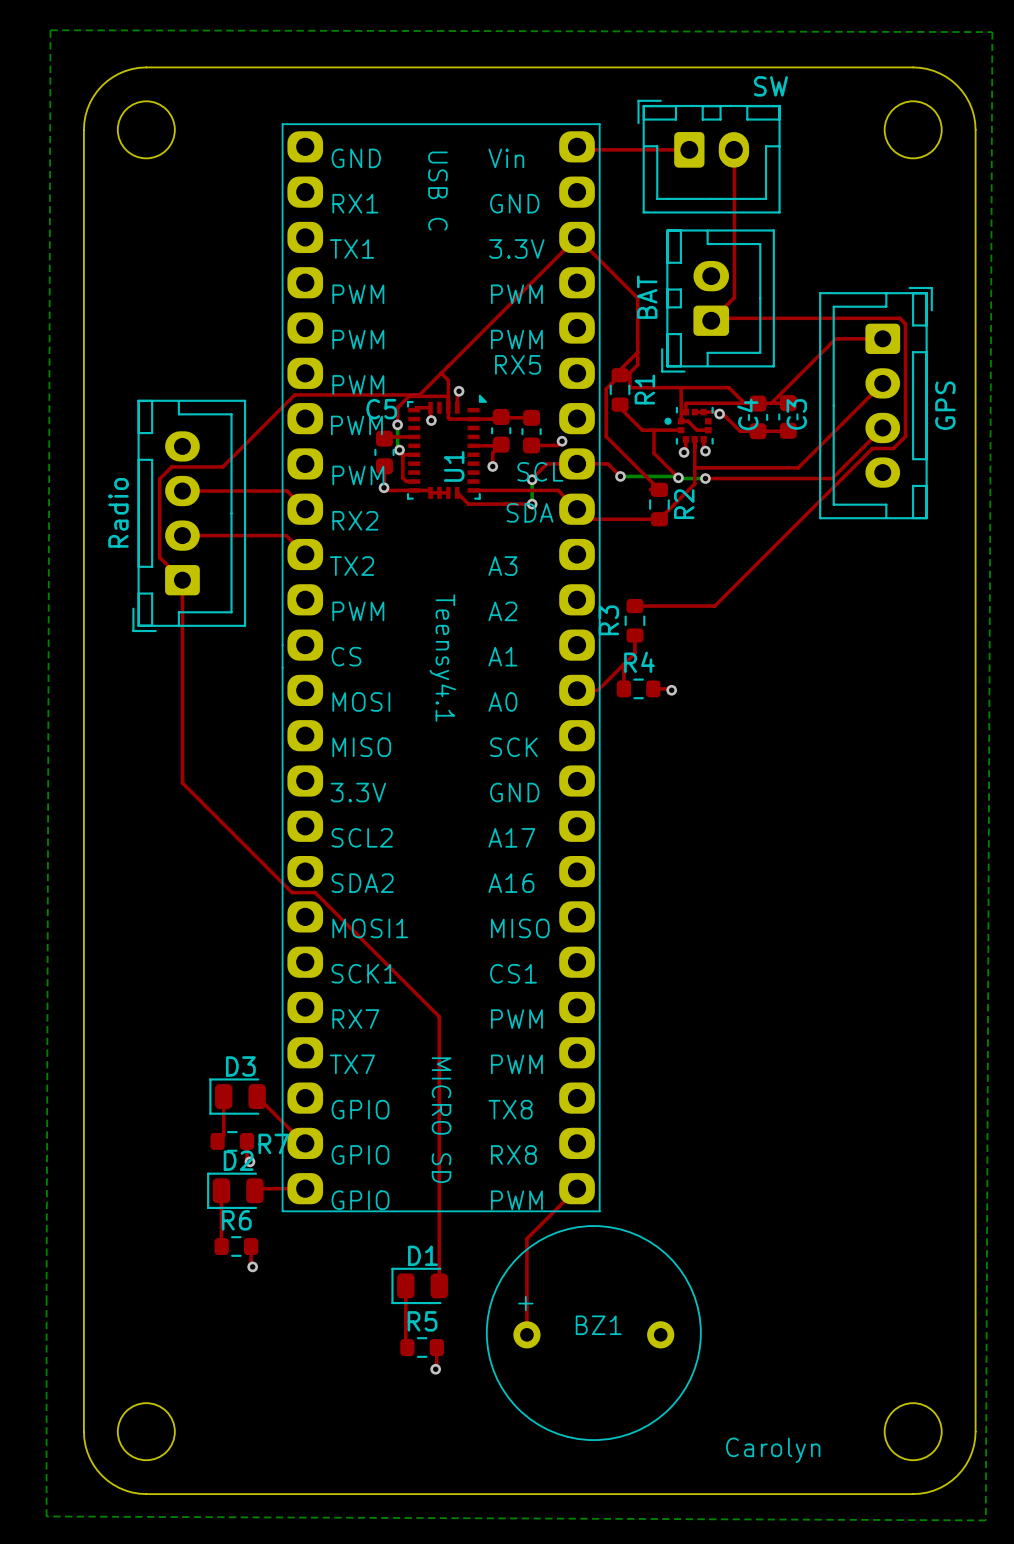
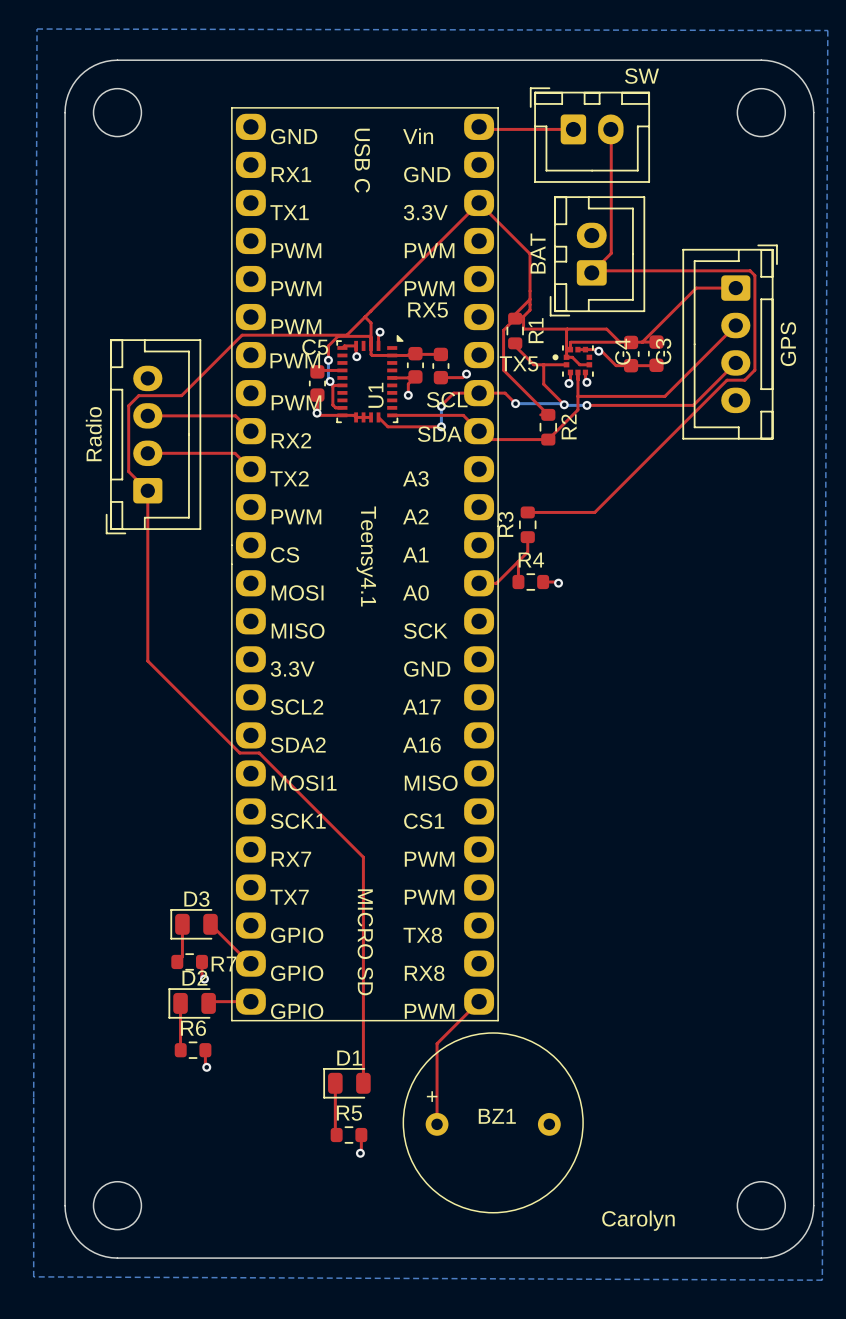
Teensy4.1 text: none -> TX5 (519, 363)

